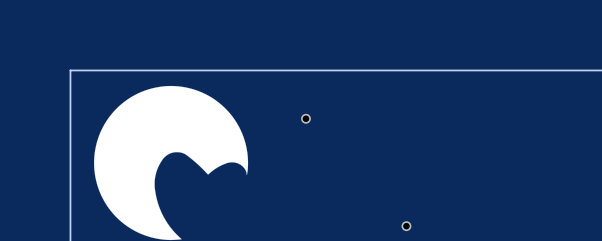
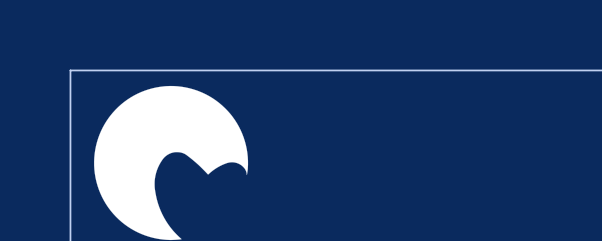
via: (305, 118) -> none
via: (406, 226) -> none

